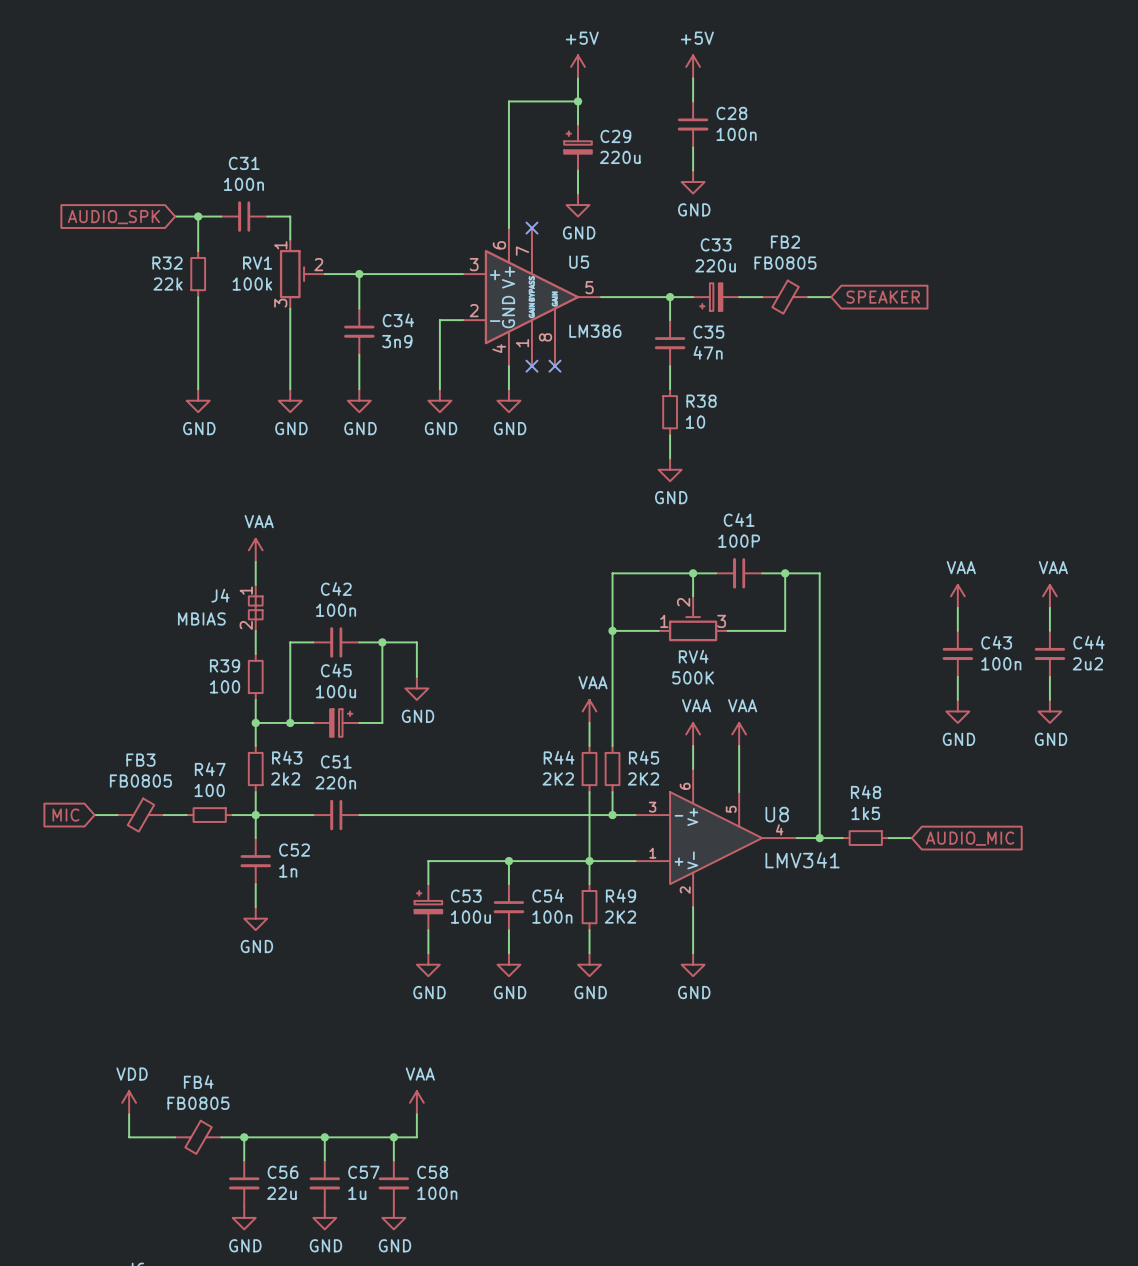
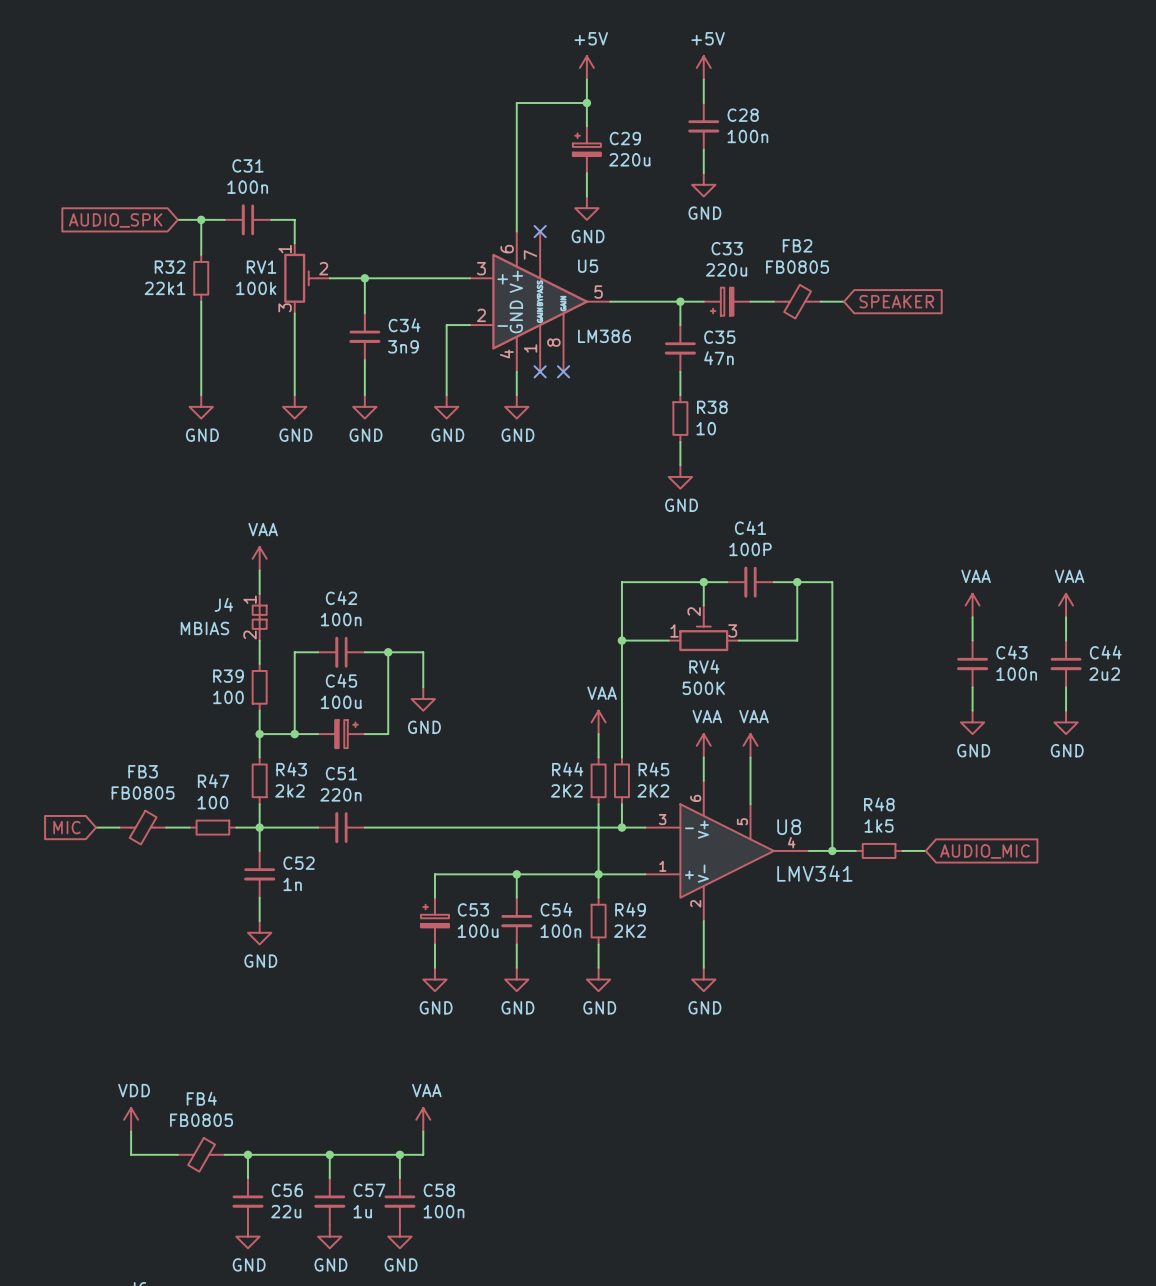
R32 value: 22k (168, 284) -> 22k1 (165, 288)

